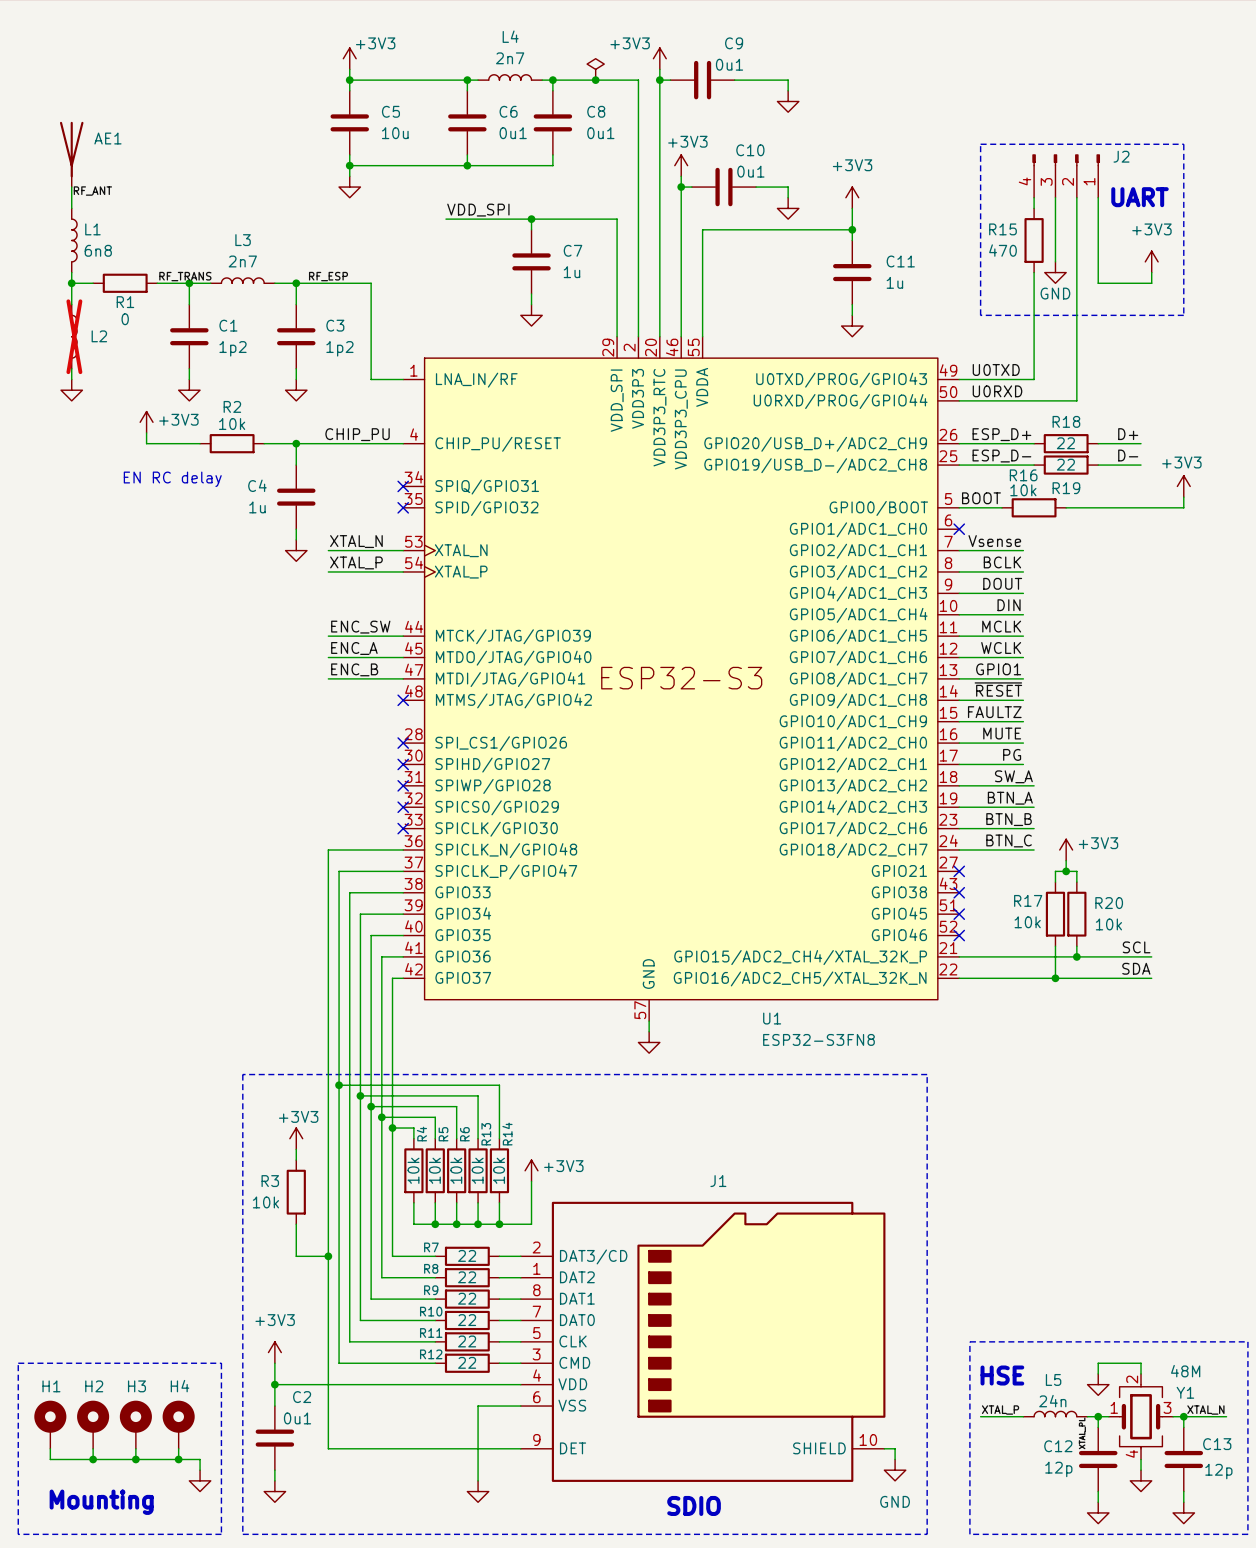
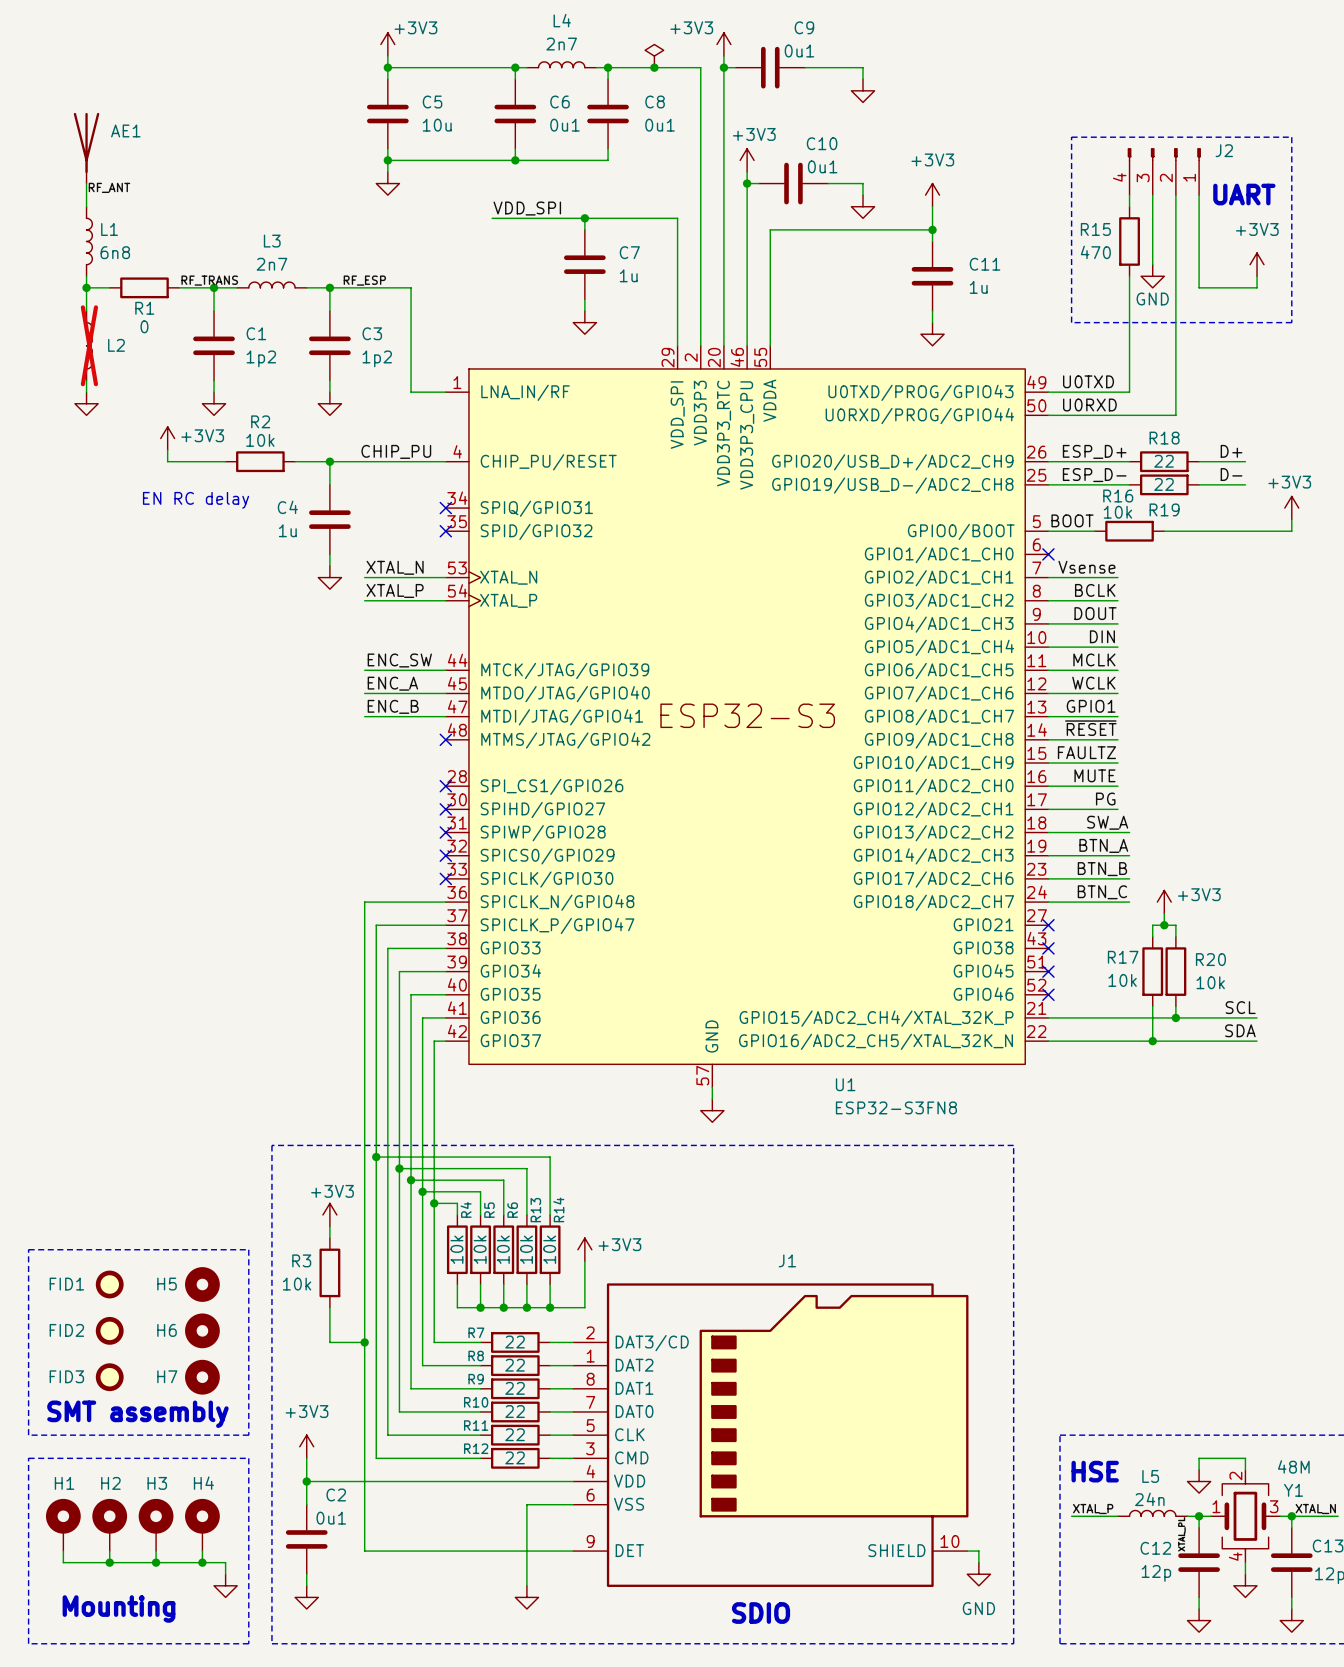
line: none -> (28, 1249) (248, 1249) (248, 1435) (28, 1435) (28, 1249)
FID1: none -> (109, 1284)
H5: none -> (202, 1284)
FID2: none -> (109, 1330)
H6: none -> (202, 1330)
FID3: none -> (109, 1377)
H7: none -> (202, 1377)
text: none -> SMT assembly (137, 1414)

